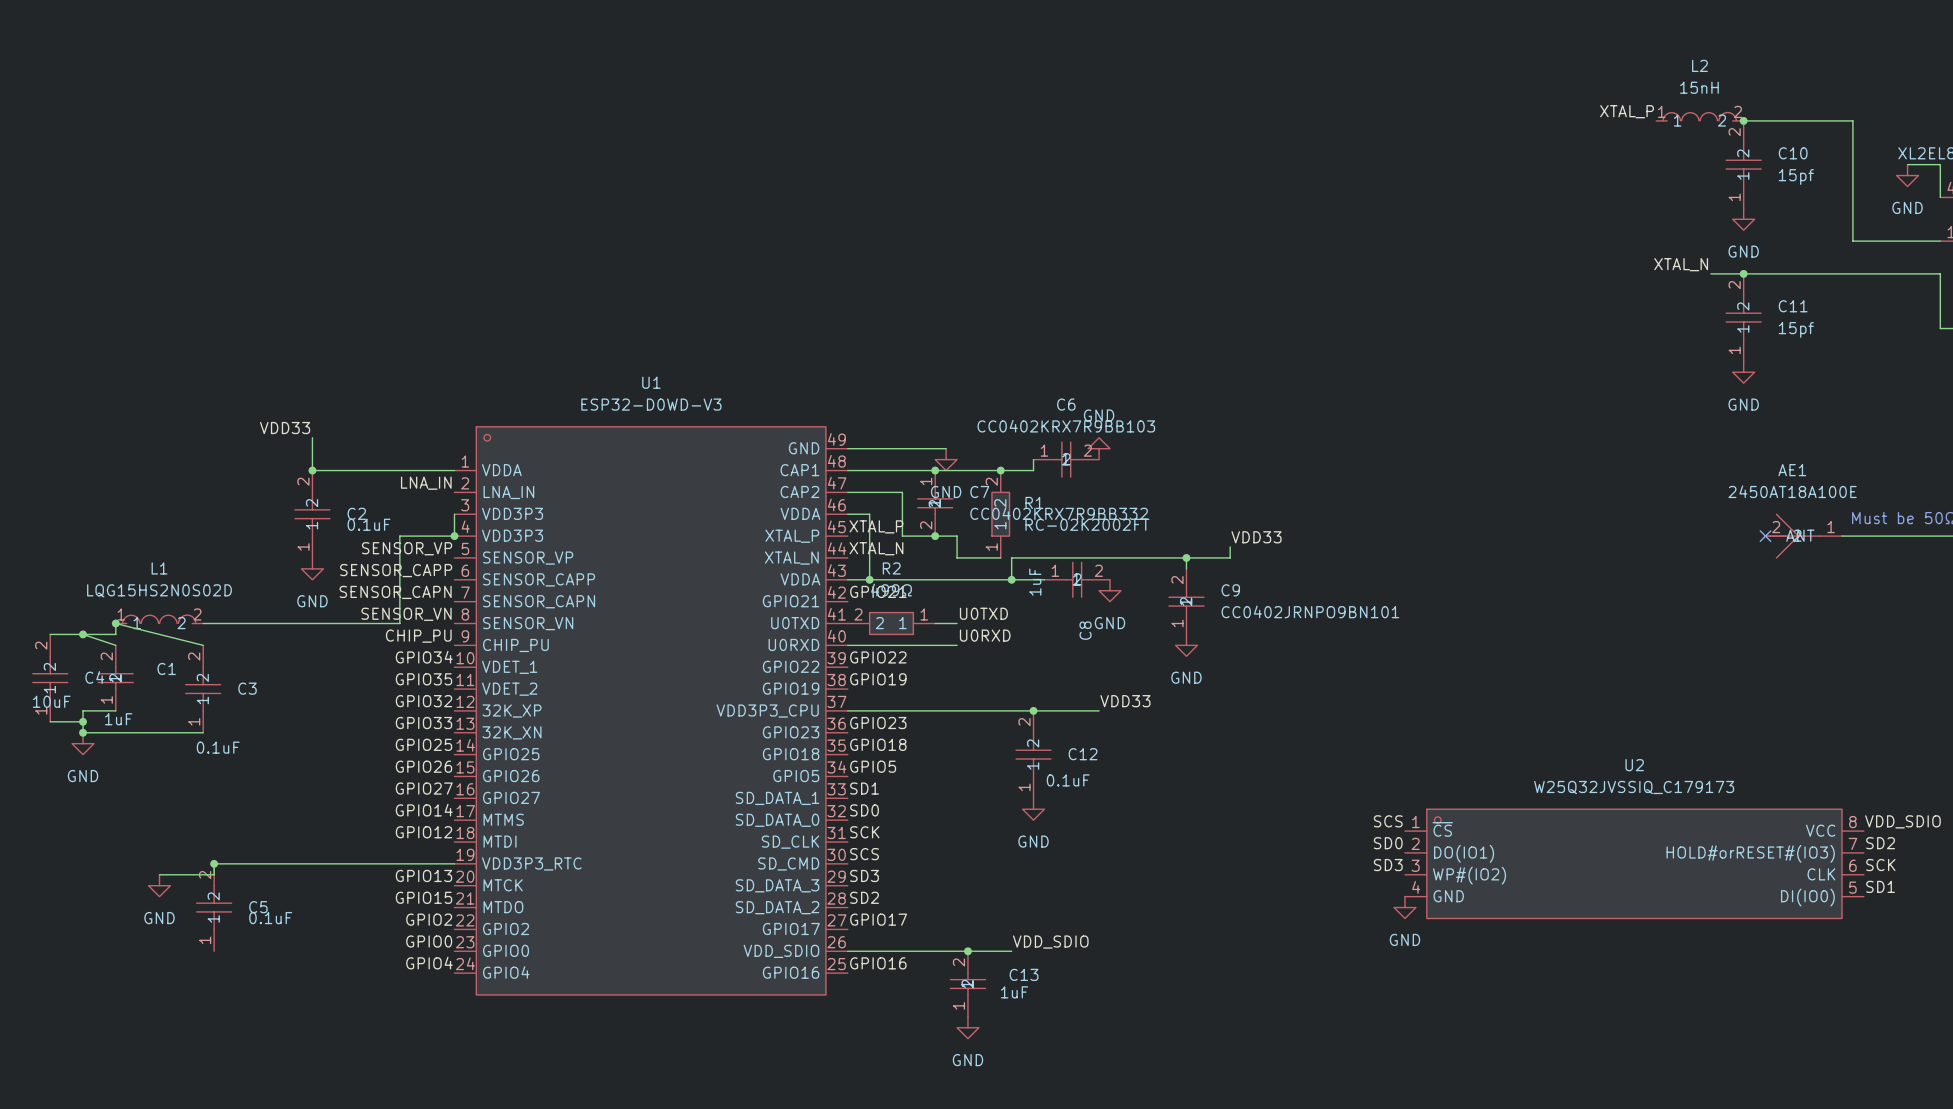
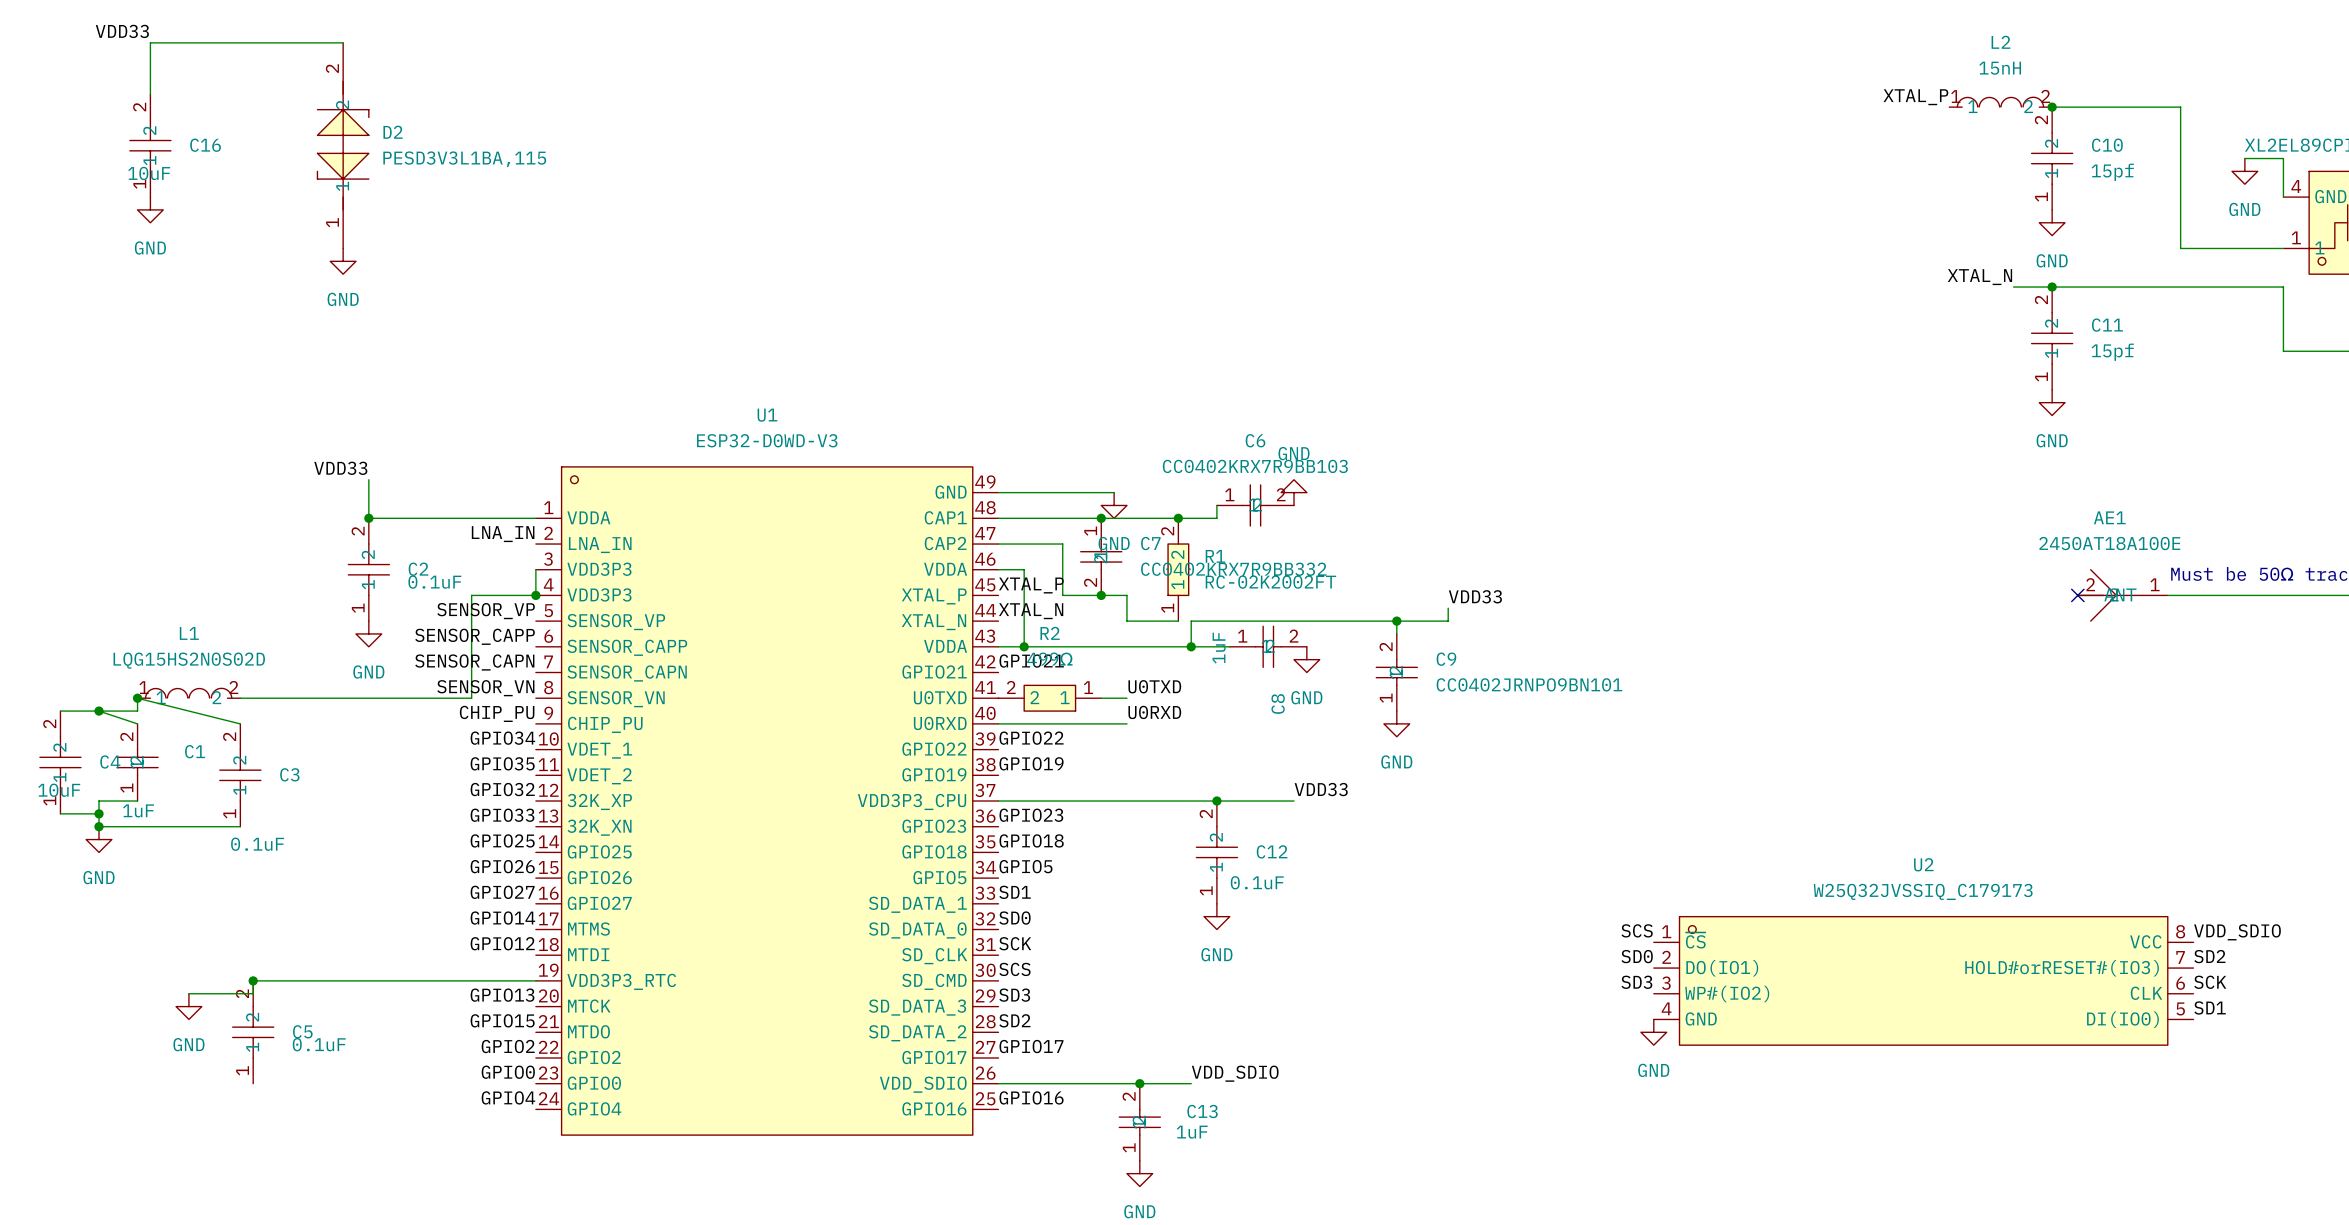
label: none -> VDD33 (122, 31)
wire: none -> (343, 42) (150, 42) (150, 94)
C16: none -> 10uF (150, 145)
D2: none -> PESD3V3L1BA,115 (343, 145)
power symbol: none -> GND (150, 209)
power symbol: none -> GND (343, 261)

